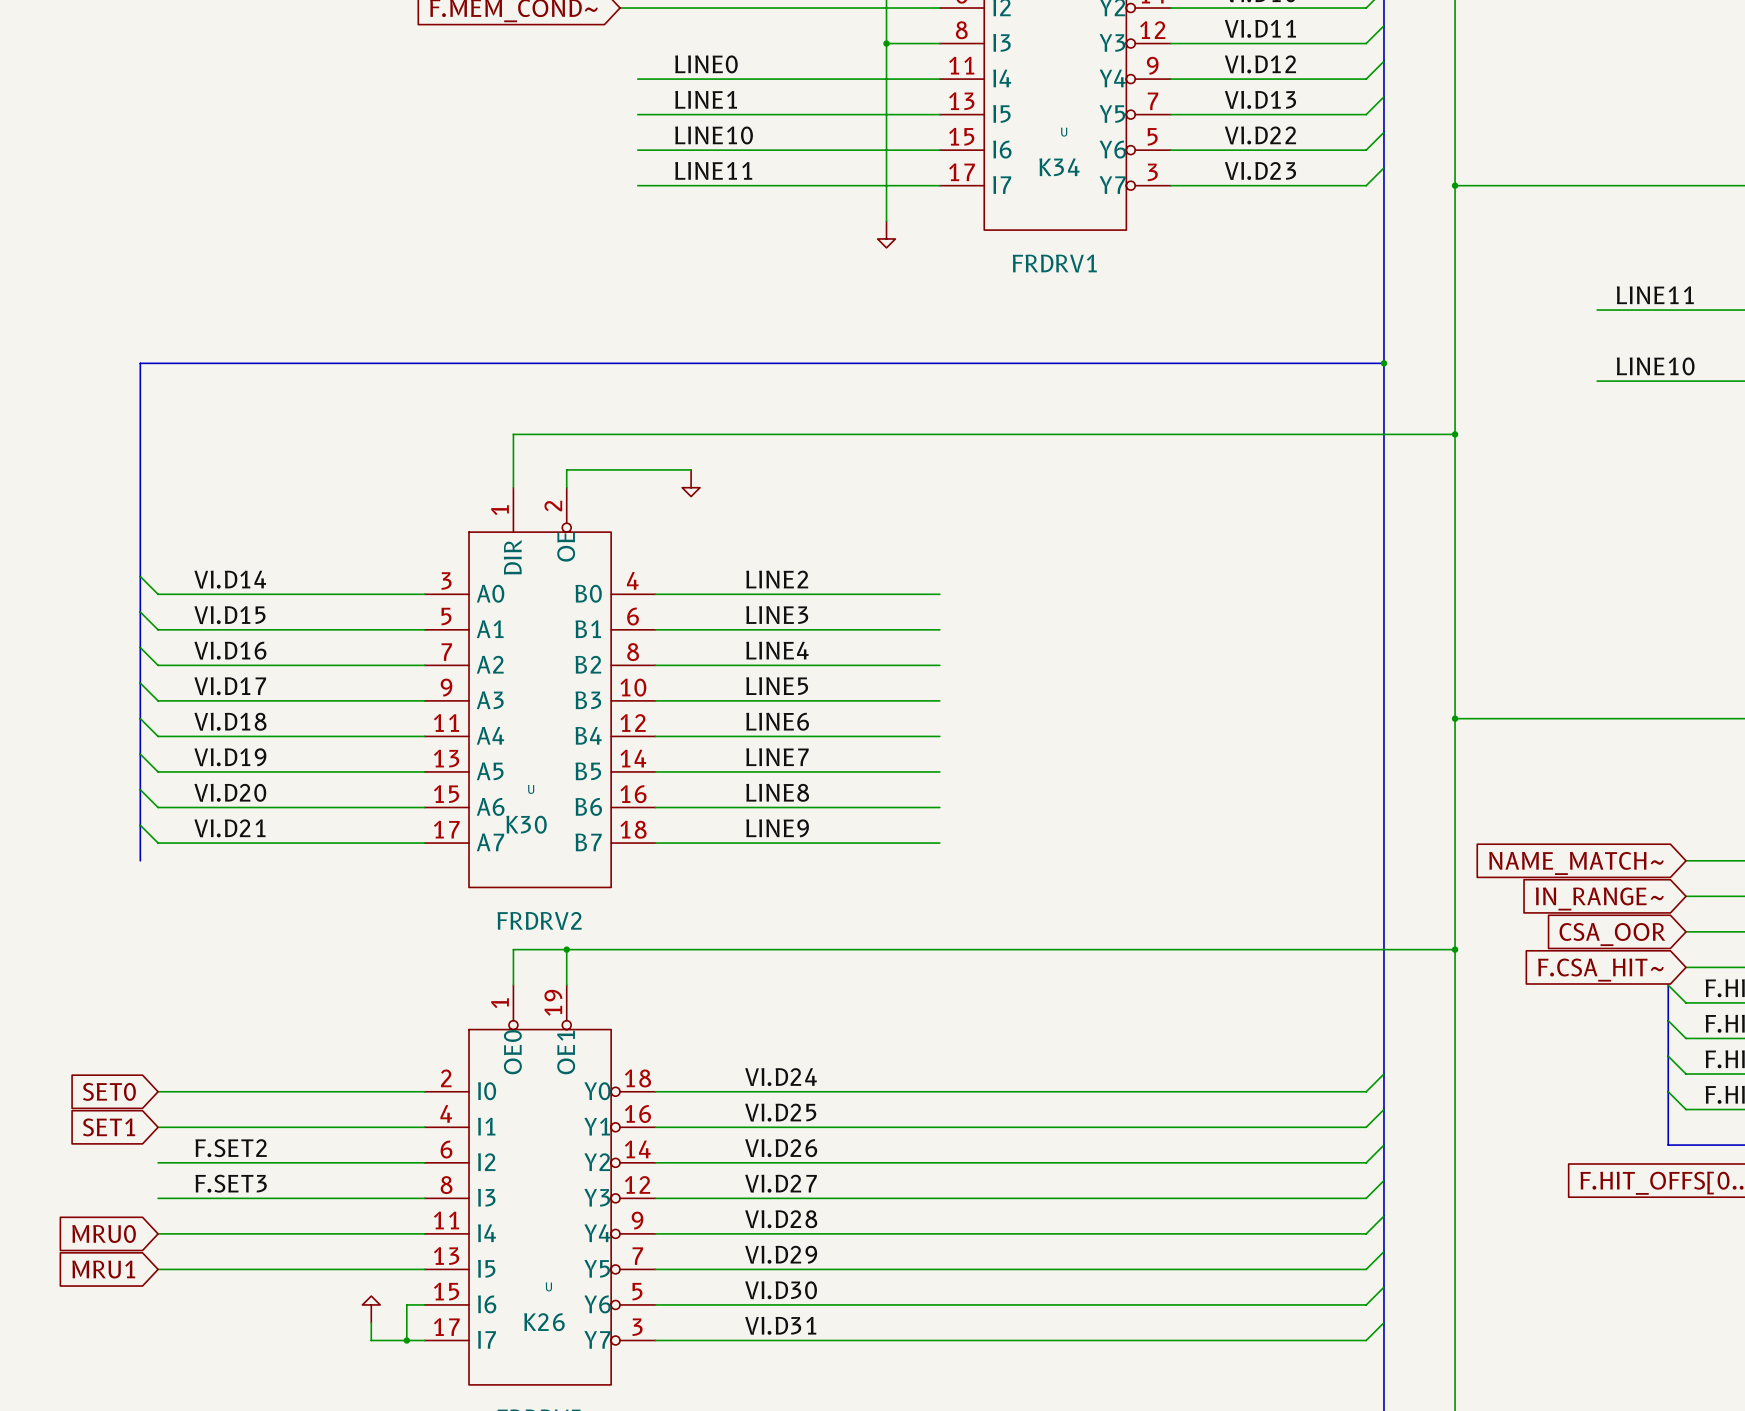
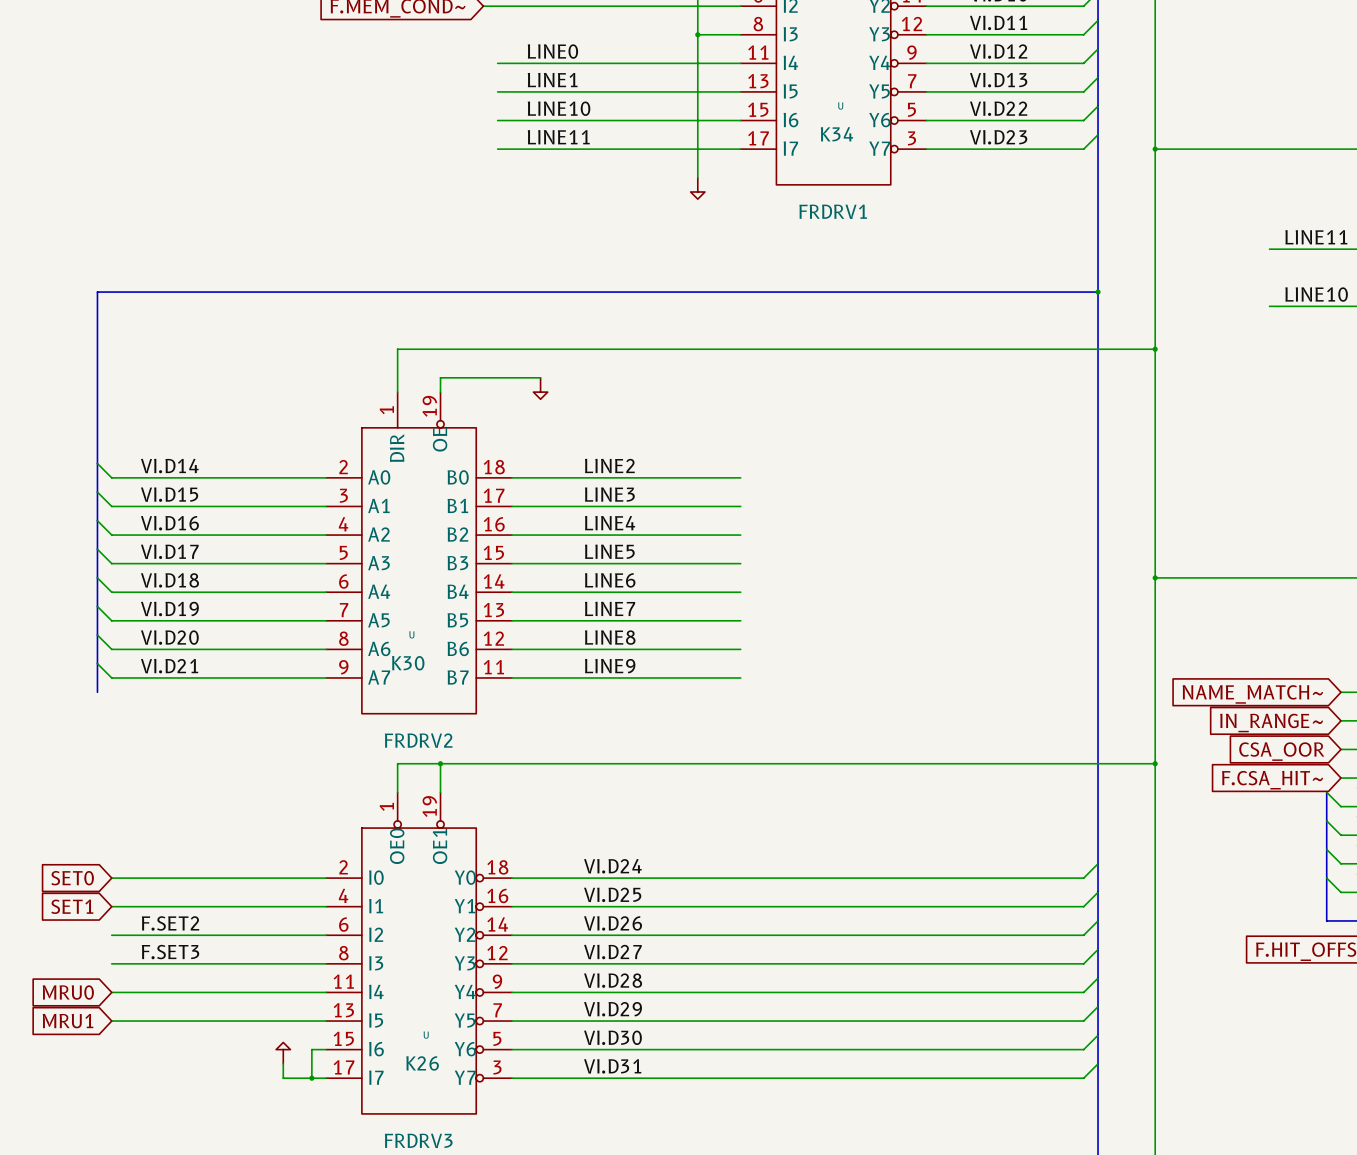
U symbol: [424, 487, 656, 888] -> [326, 392, 512, 714]

